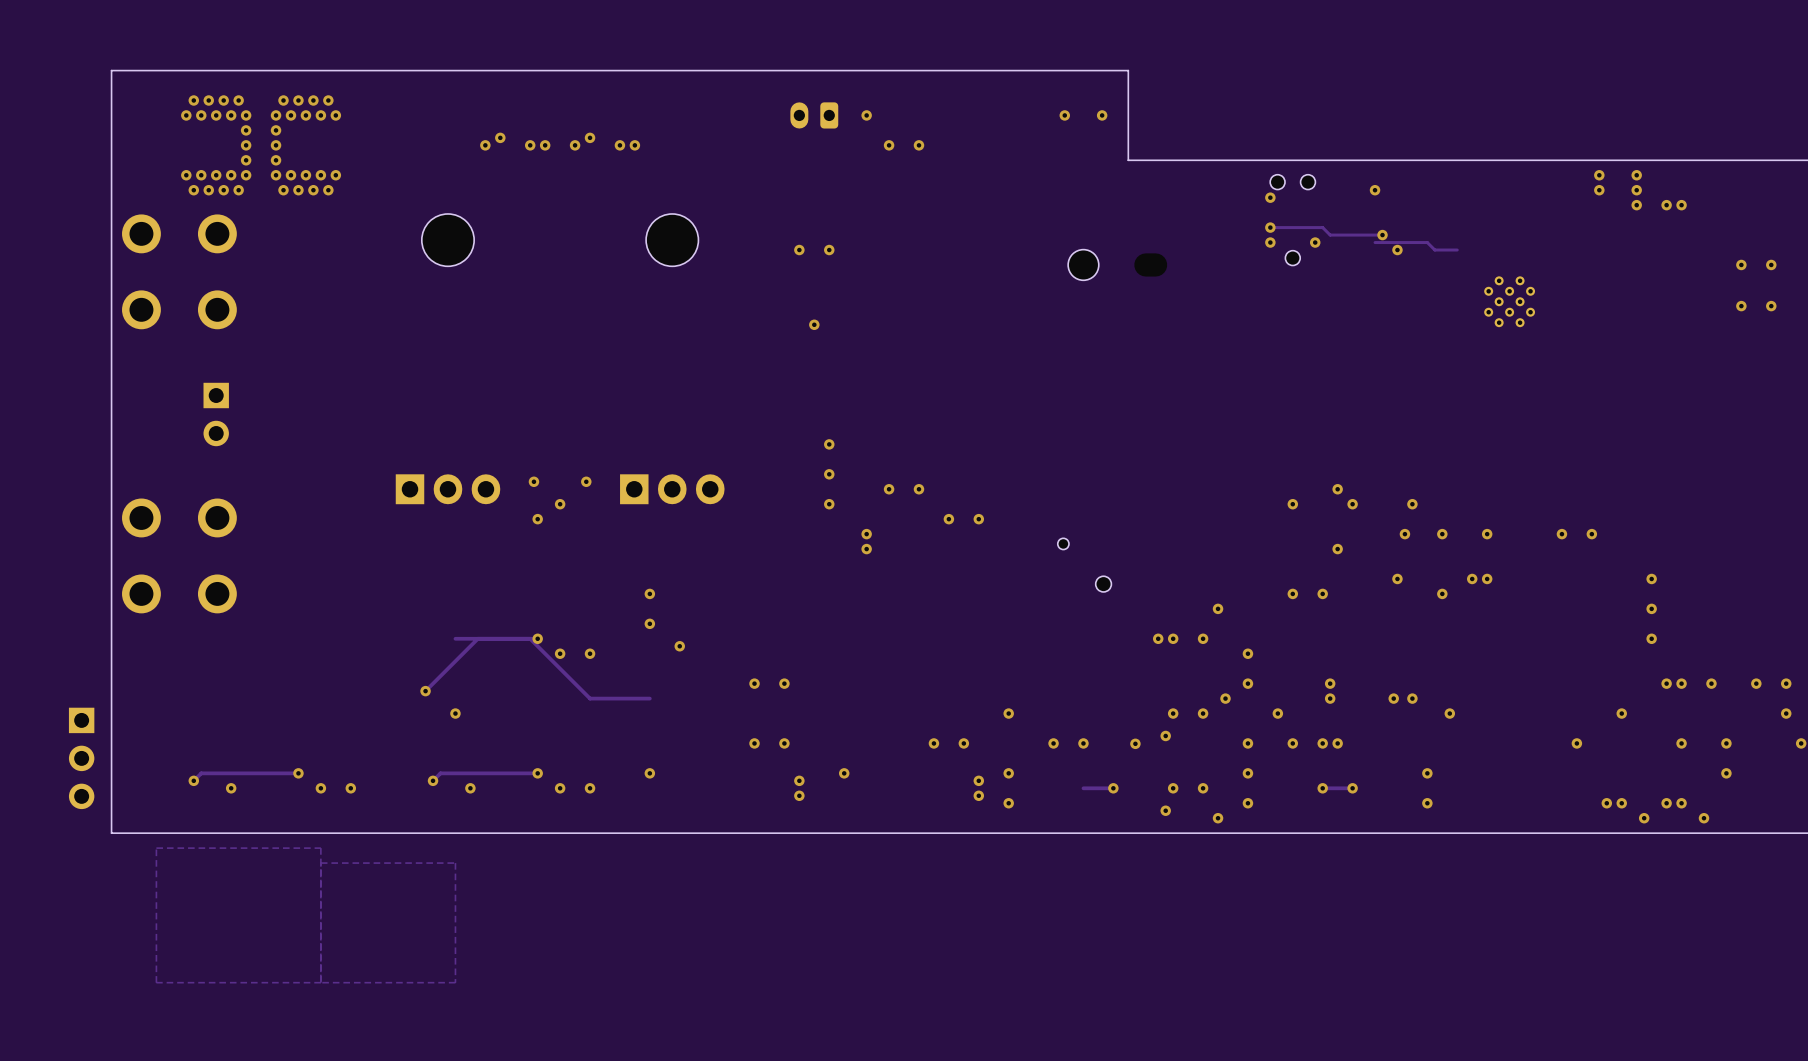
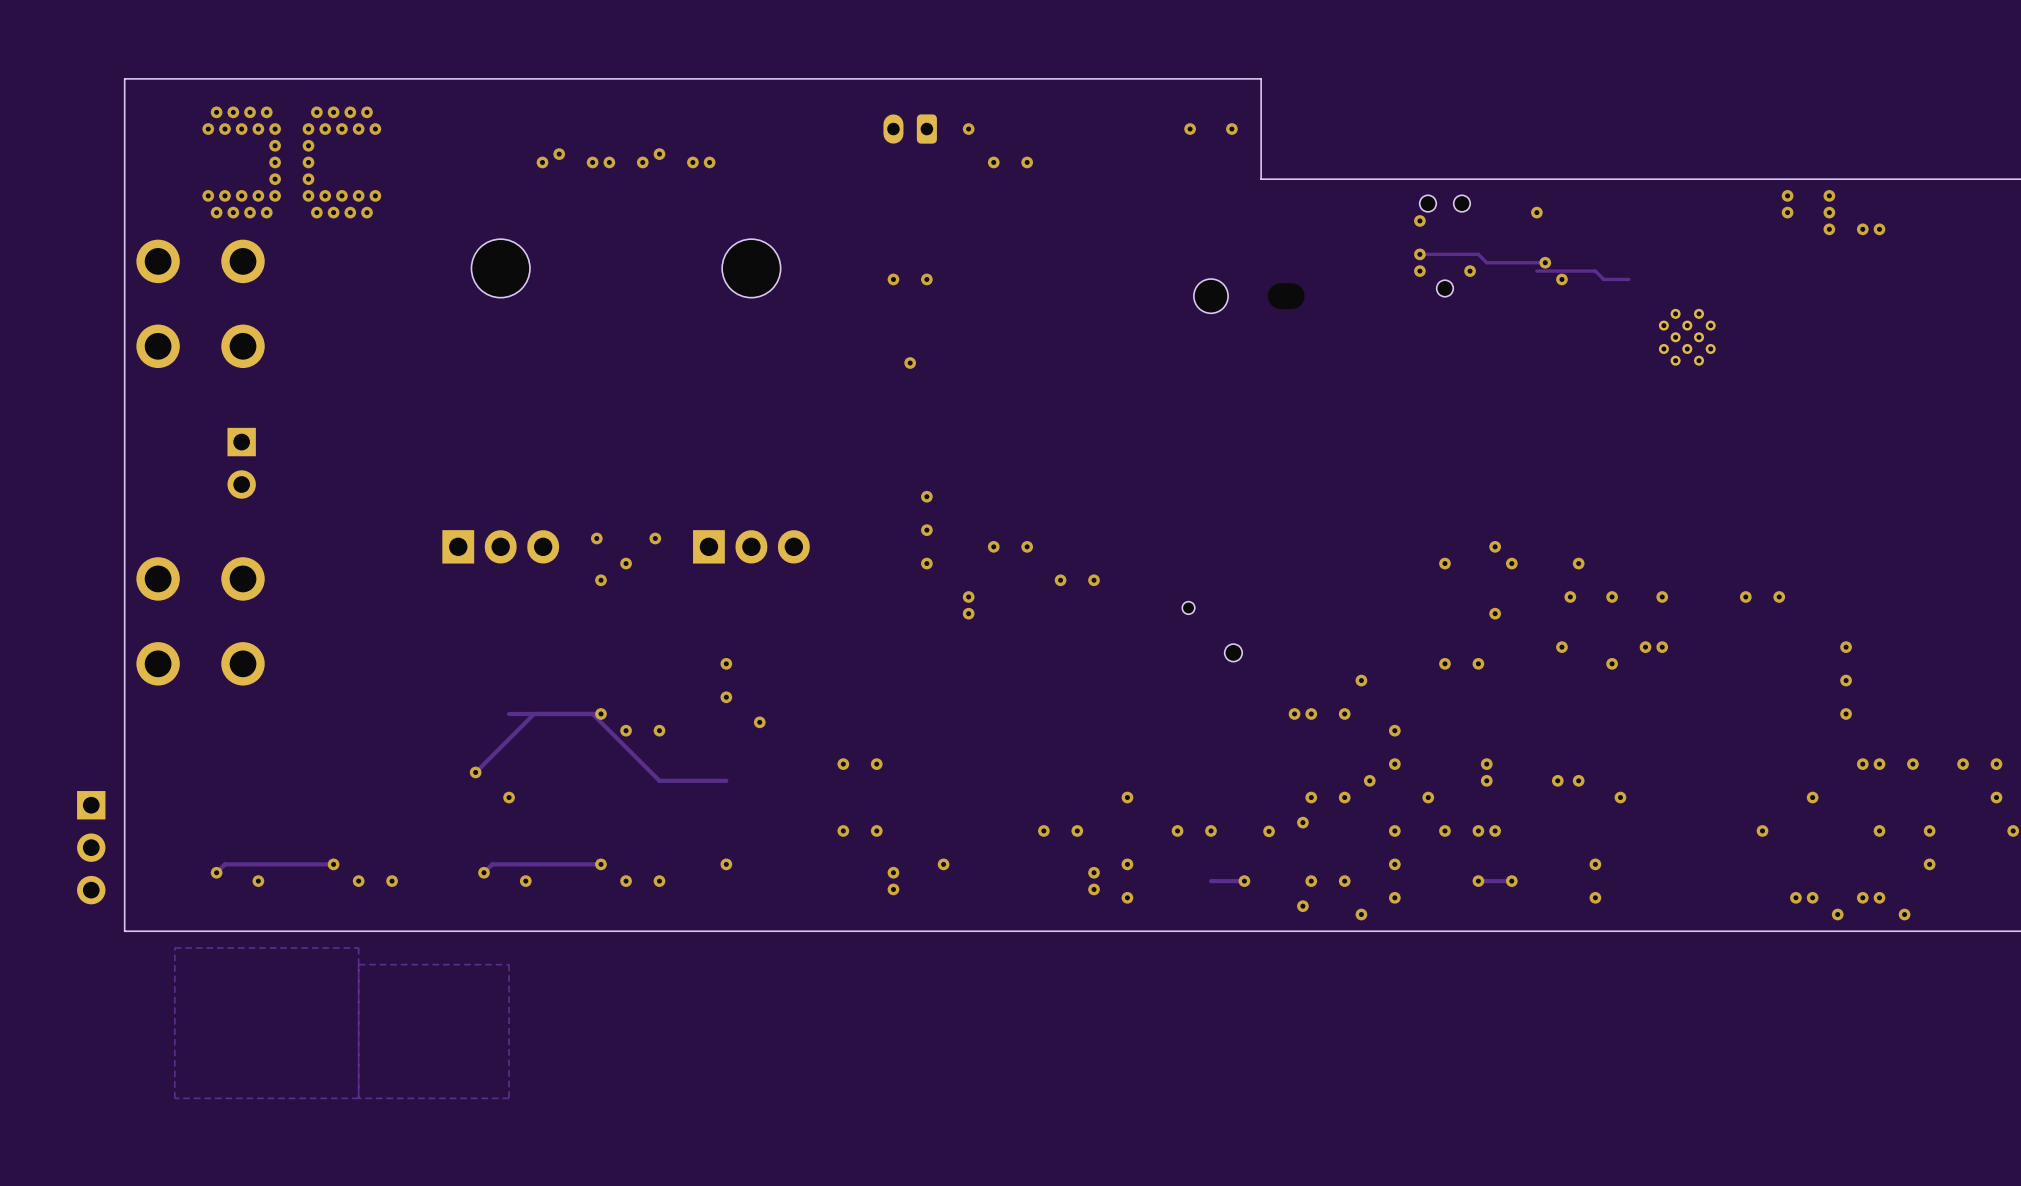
via: (1741, 264) -> none
via: (1771, 264) -> none
via: (1741, 306) -> none
via: (1771, 306) -> none

